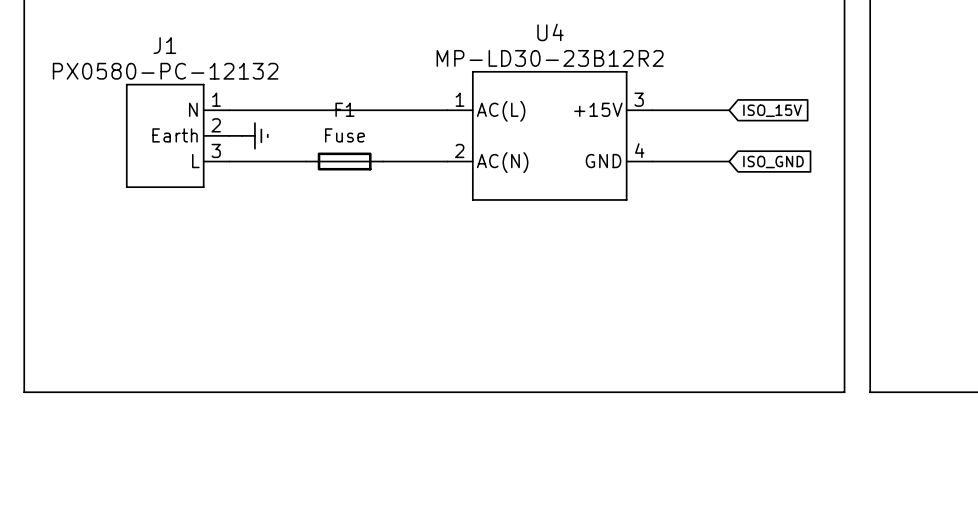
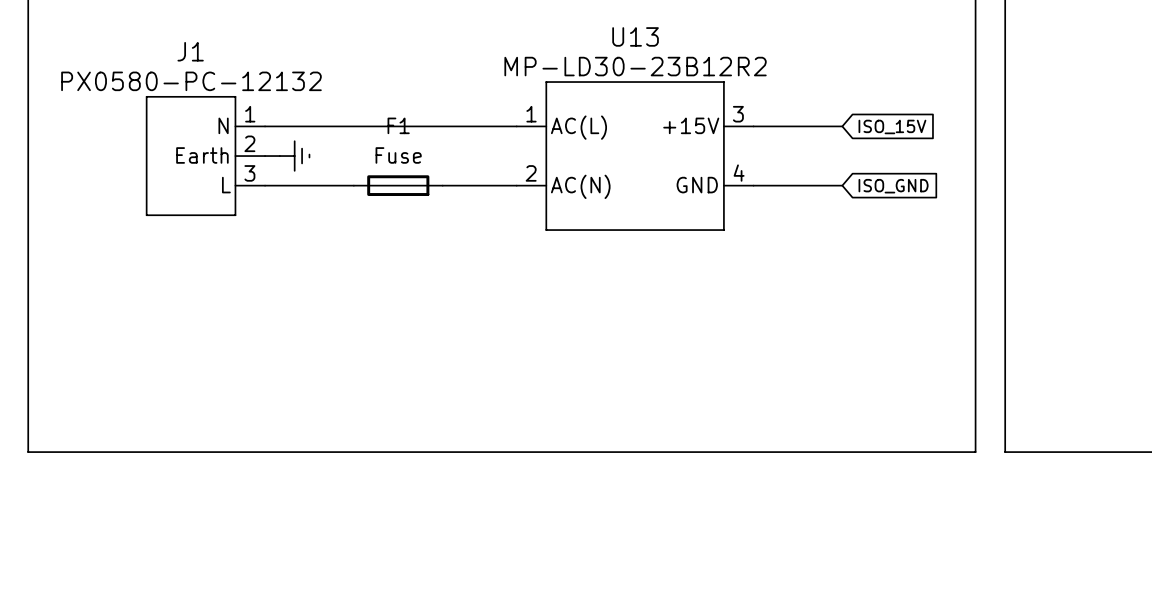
U4 name: U4 (550, 32) -> U13 (635, 36)

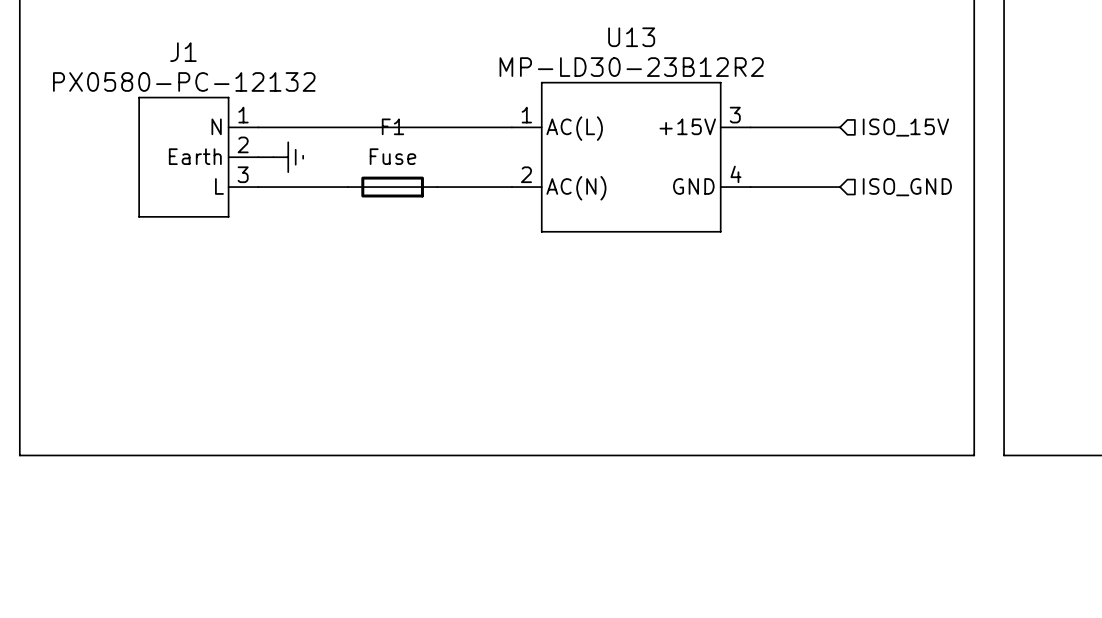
global label: ISO_15V (892, 126) -> none
hierarchical label: none -> ISO_15V (905, 127)
hierarchical label: none -> ISO_GND (907, 187)
global label: ISO_GND (893, 186) -> none

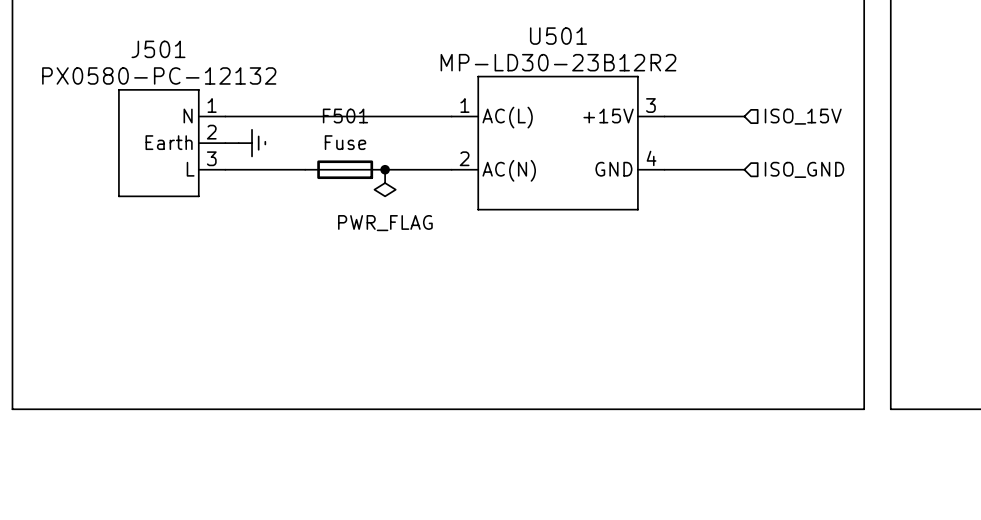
U13 name: U13 (631, 37) -> U501 (558, 36)
J1 name: J1 (183, 52) -> J501 (158, 49)
F1 name: F1 (392, 126) -> F501 (345, 116)
junction: none -> (385, 169)
power symbol: none -> PWR_FLAG (385, 183)

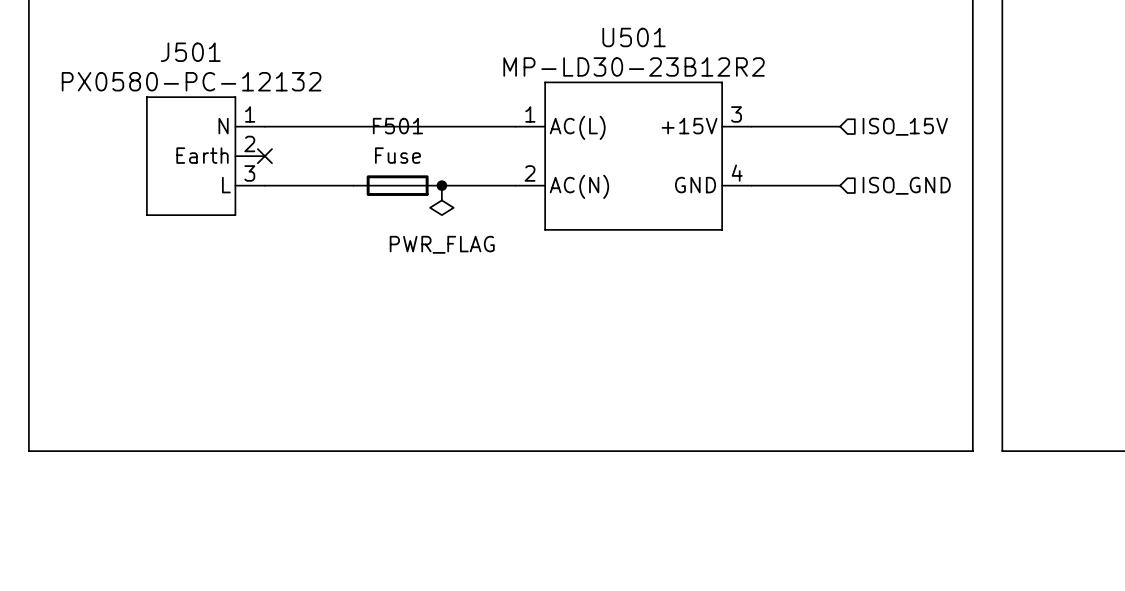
wire: (225, 143) (238, 143) -> none
no-connect mark: none -> (264, 156)
power symbol: (252, 143) -> none

